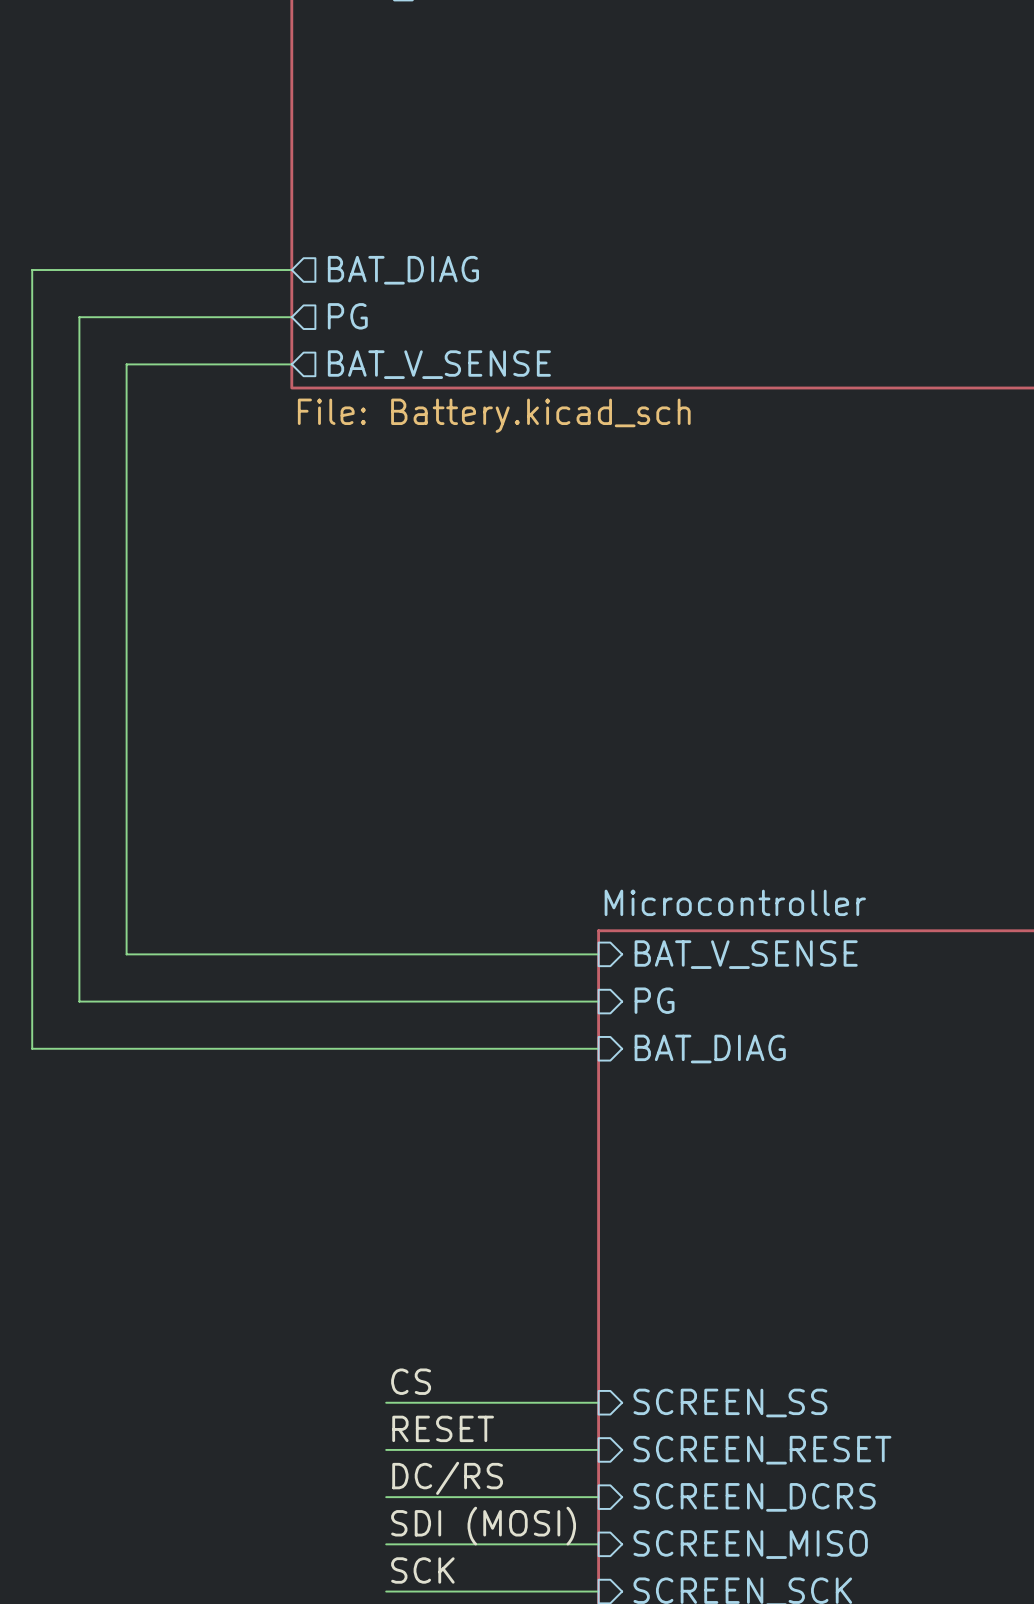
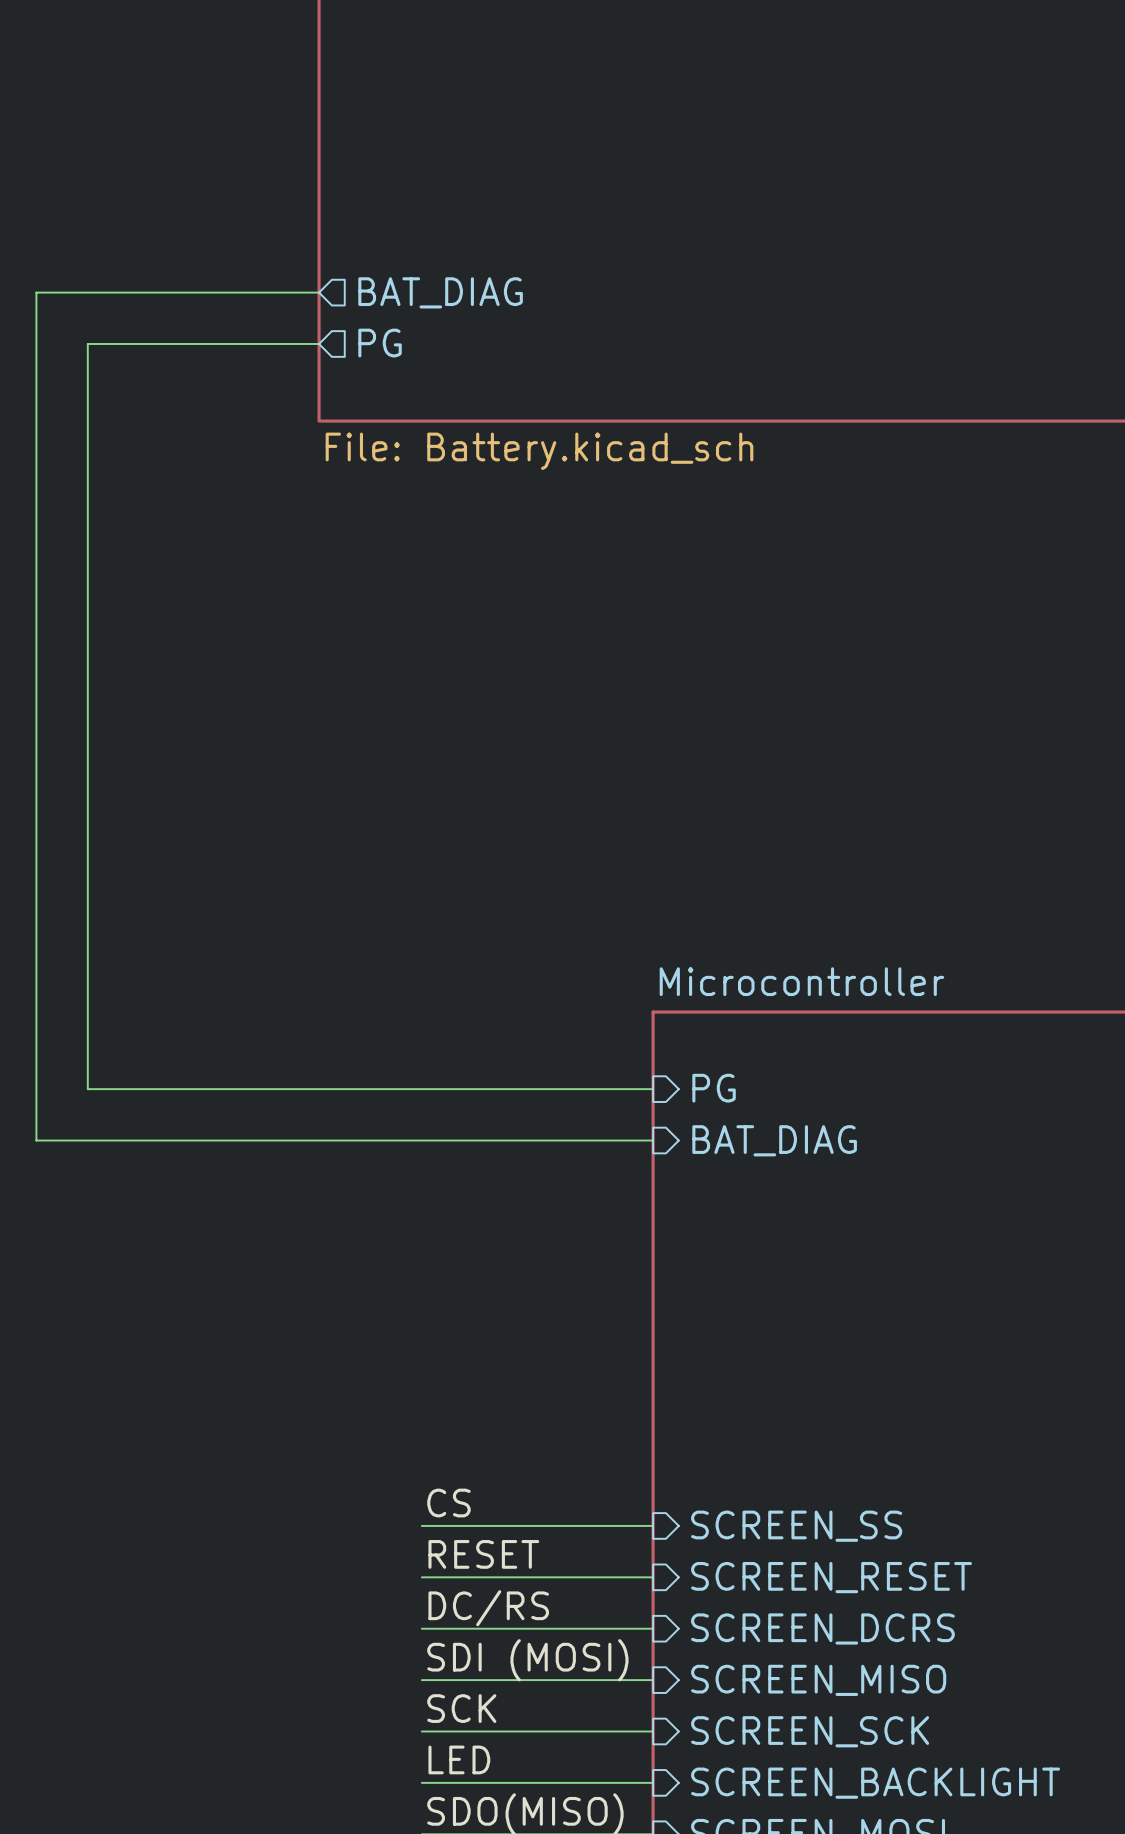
wire: (291, 364) (126, 364) (126, 954) (598, 954) -> none
sheet pin: BAT_V_SENSE (439, 364) -> none
sheet pin: BAT_V_SENSE (746, 954) -> none

